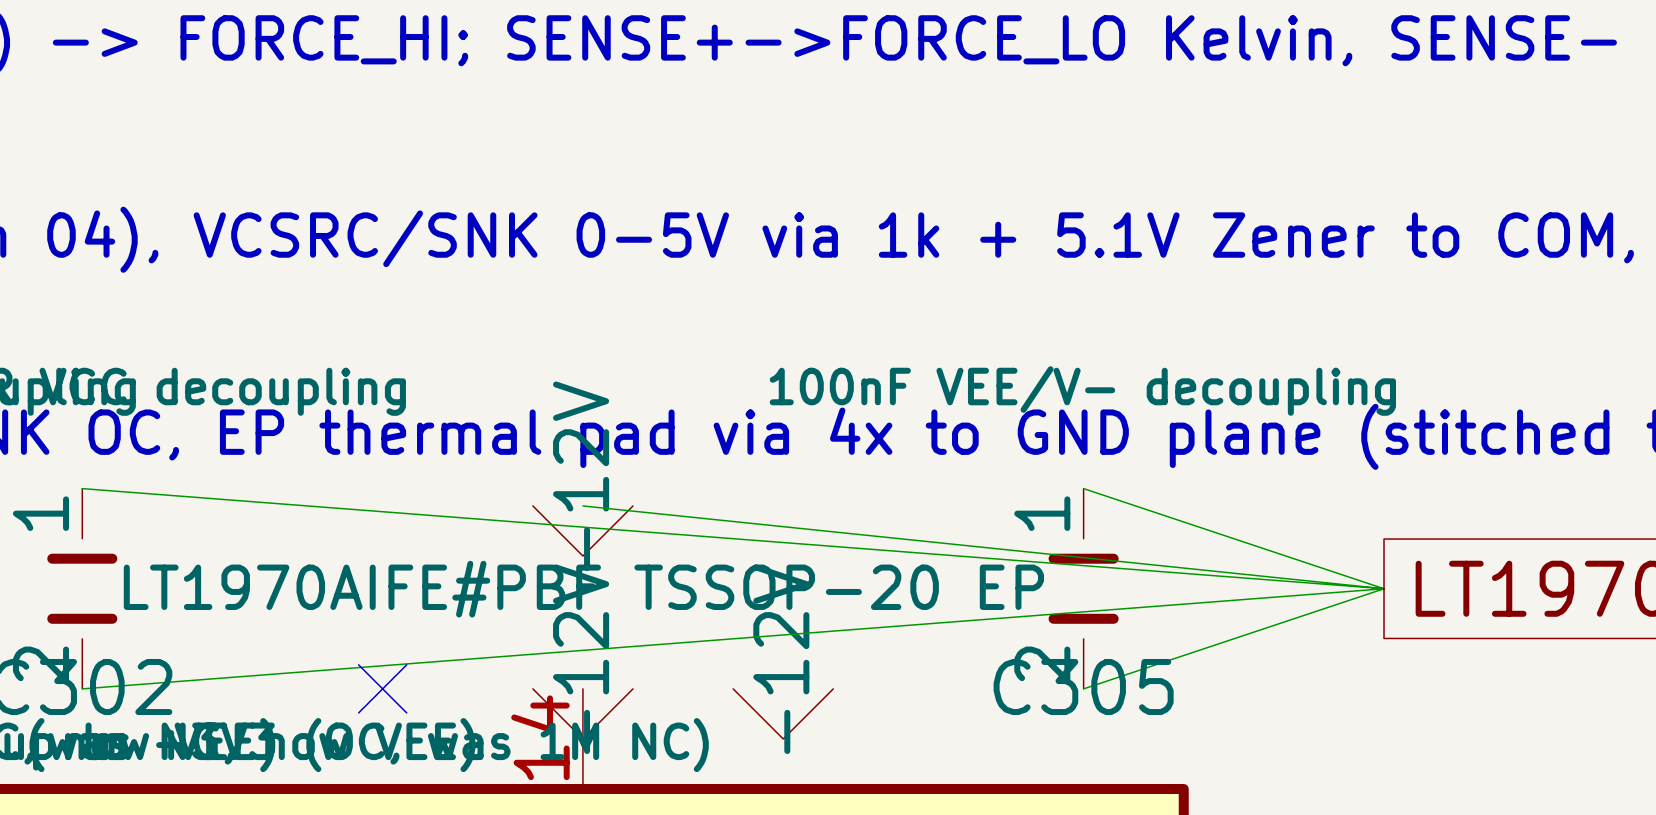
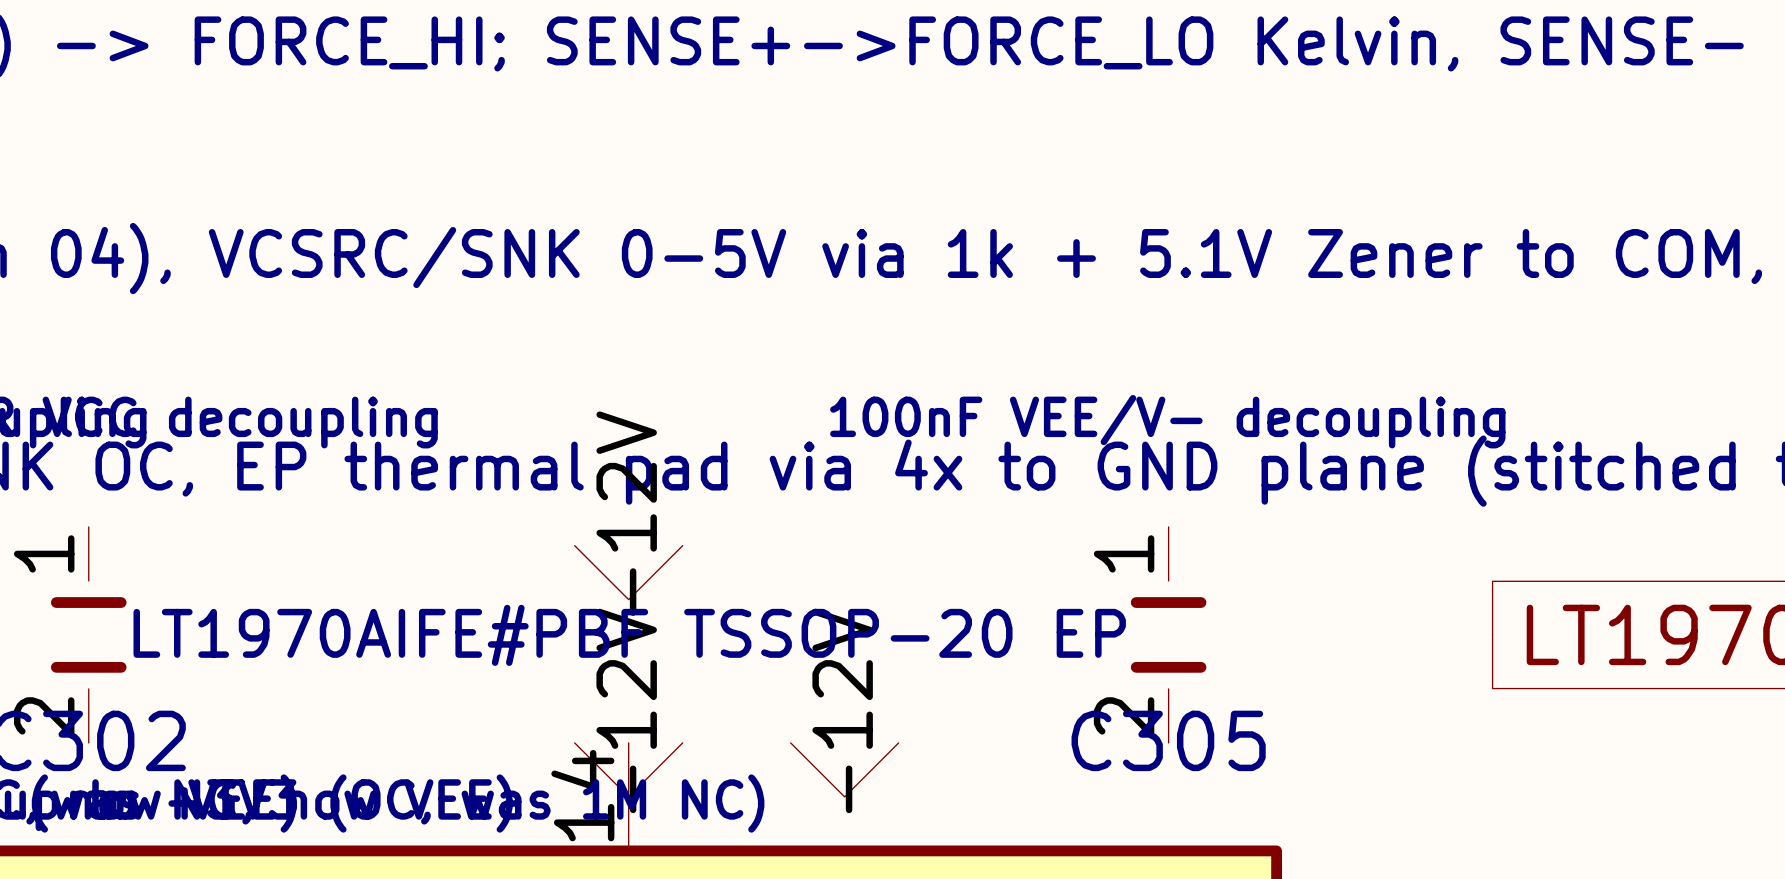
wire: (82, 488) (1384, 588) -> none
wire: (1083, 488) (1384, 588) -> none
wire: (582, 505) (1384, 588) -> none
wire: (1384, 588) (82, 688) -> none
wire: (1384, 588) (1083, 688) -> none
no-connect mark: (382, 688) -> none

